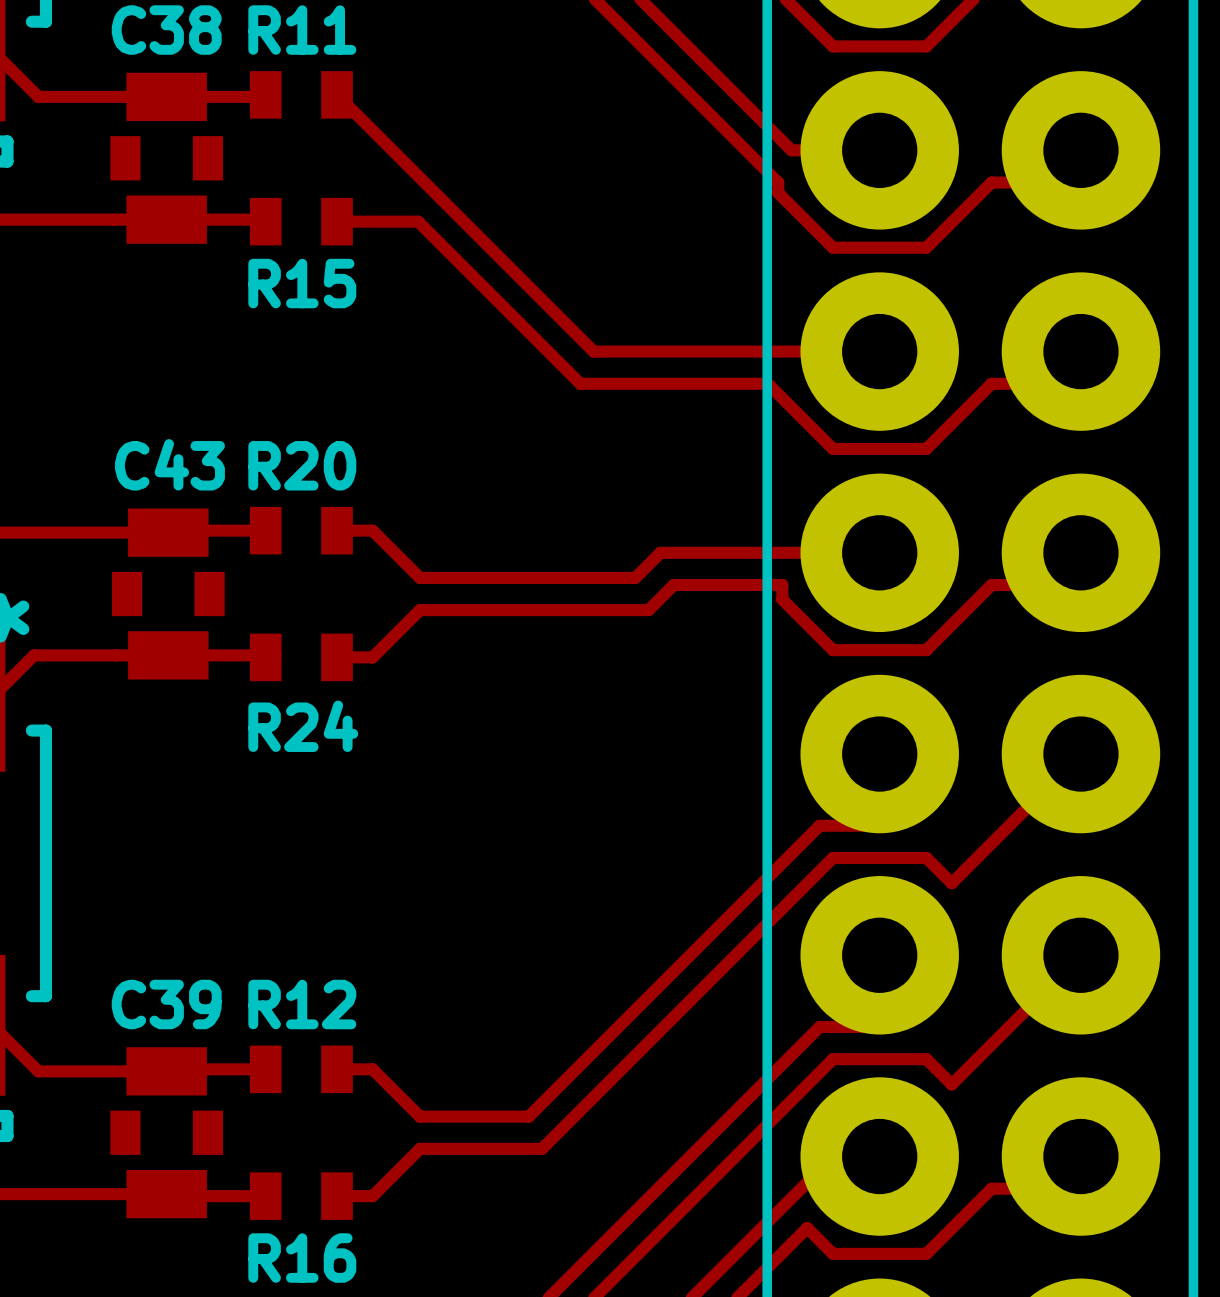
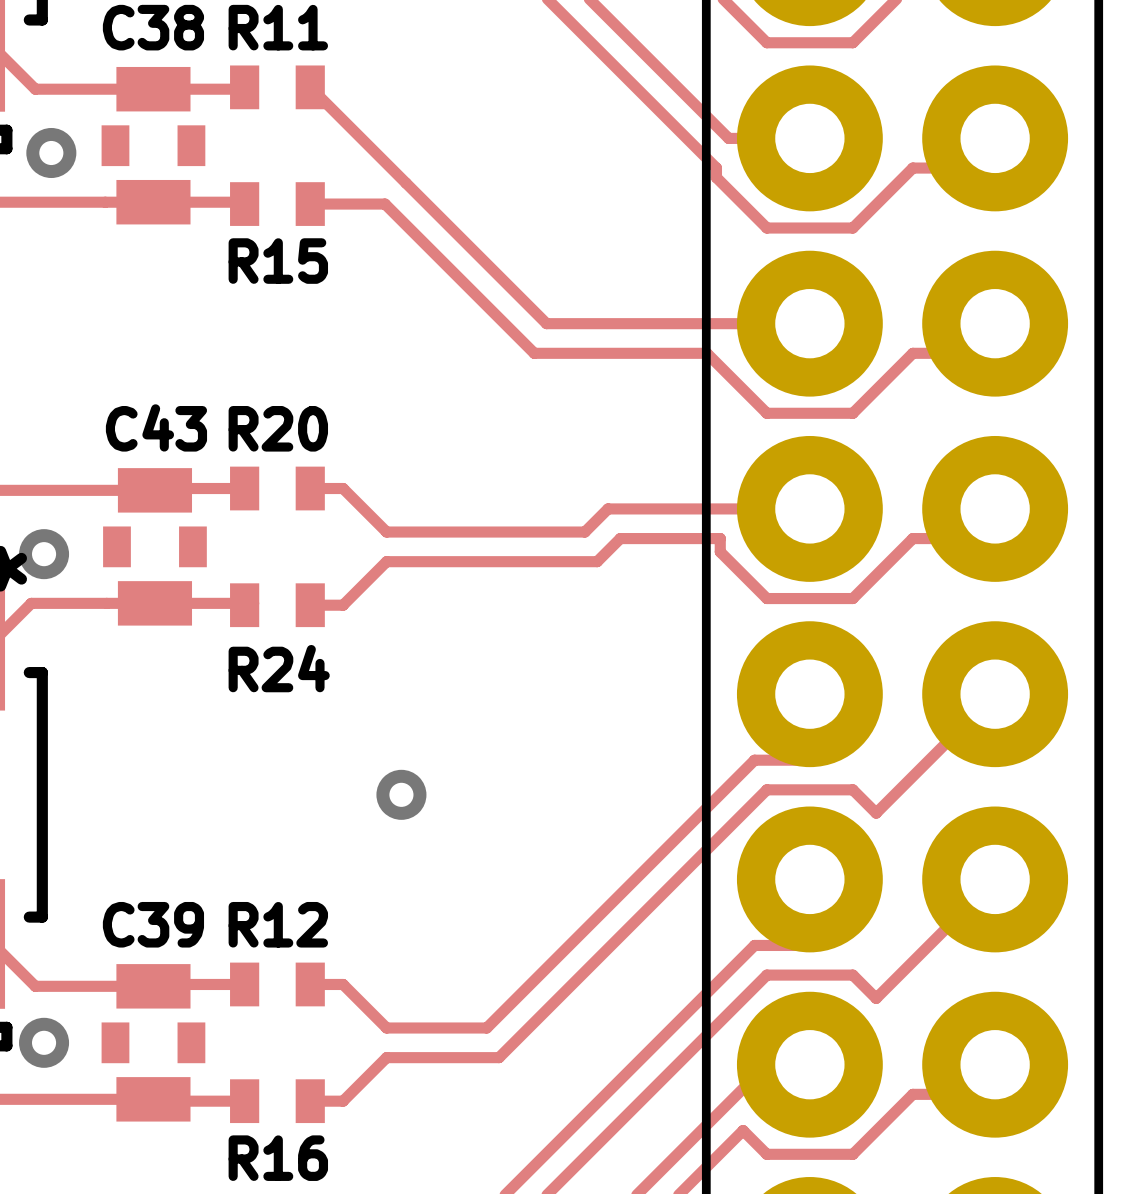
via: none -> (51, 153)
via: none -> (44, 554)
via: none -> (401, 794)
via: none -> (44, 1042)

